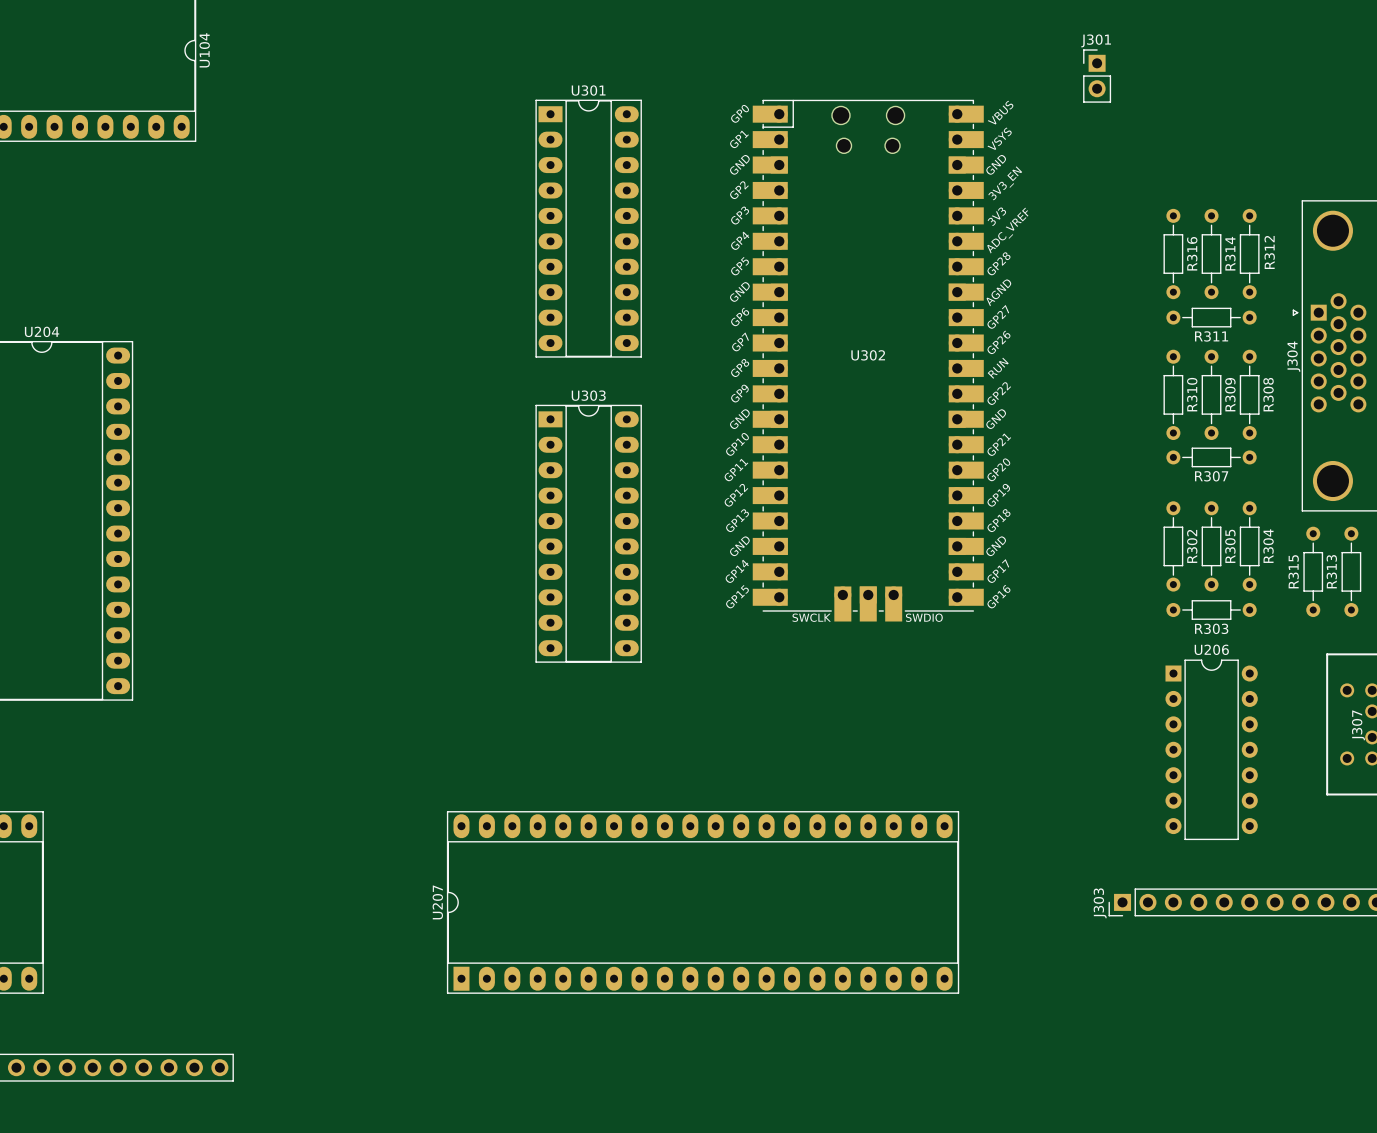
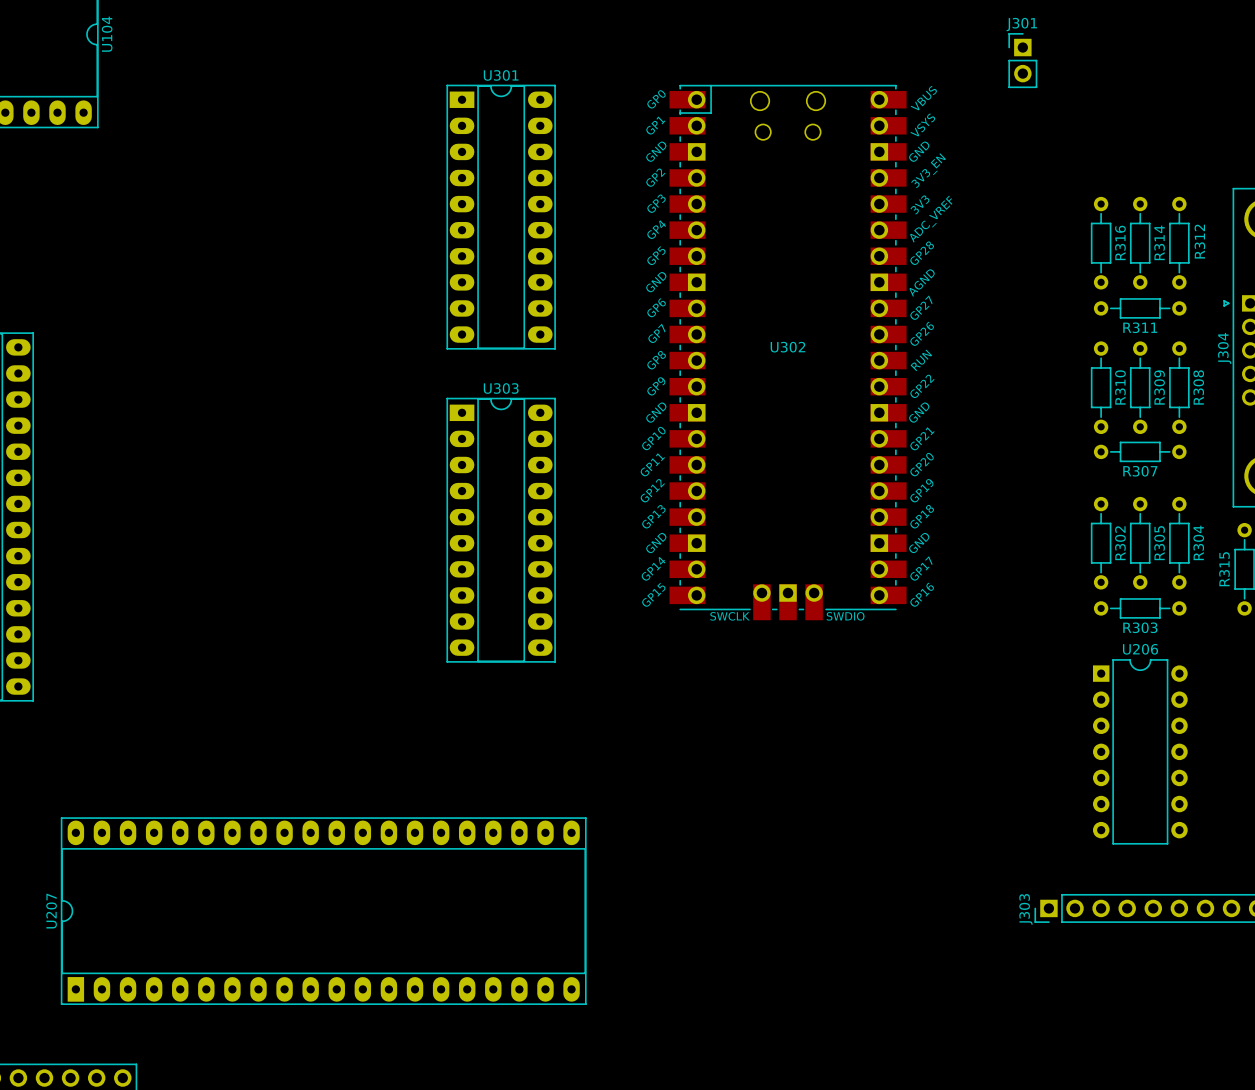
U207 position: (703, 902) -> (323, 911)

